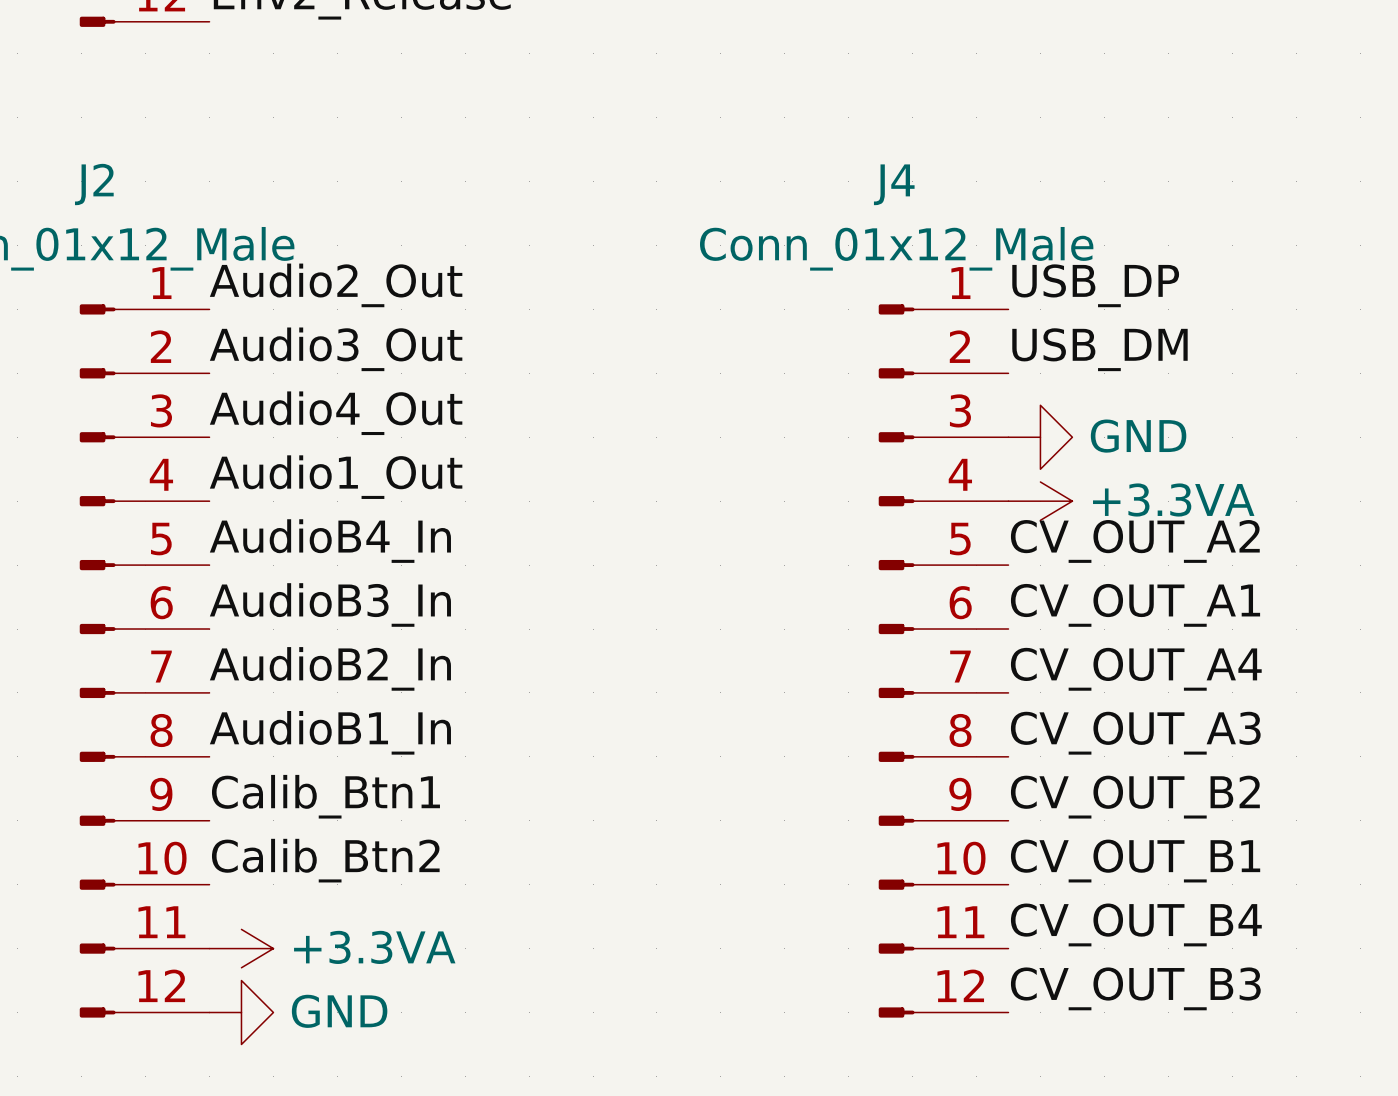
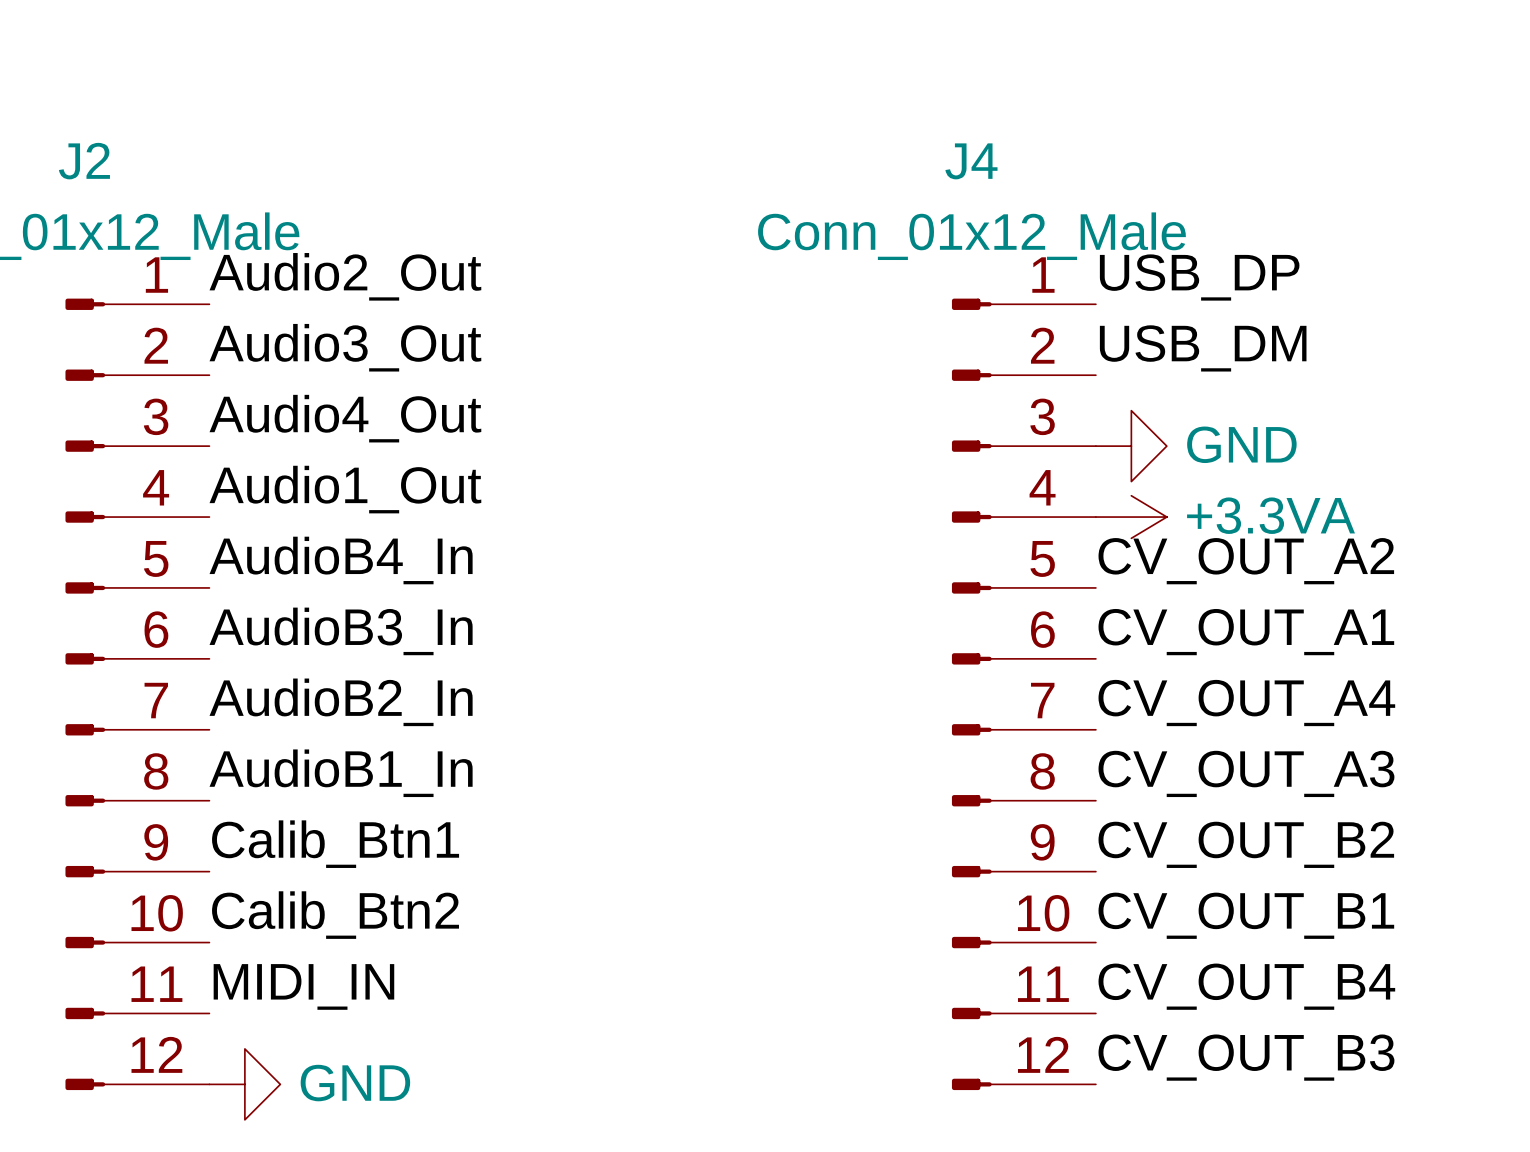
label: none -> MIDI_IN (303, 986)
power symbol: +3.3VA (241, 948) -> none

